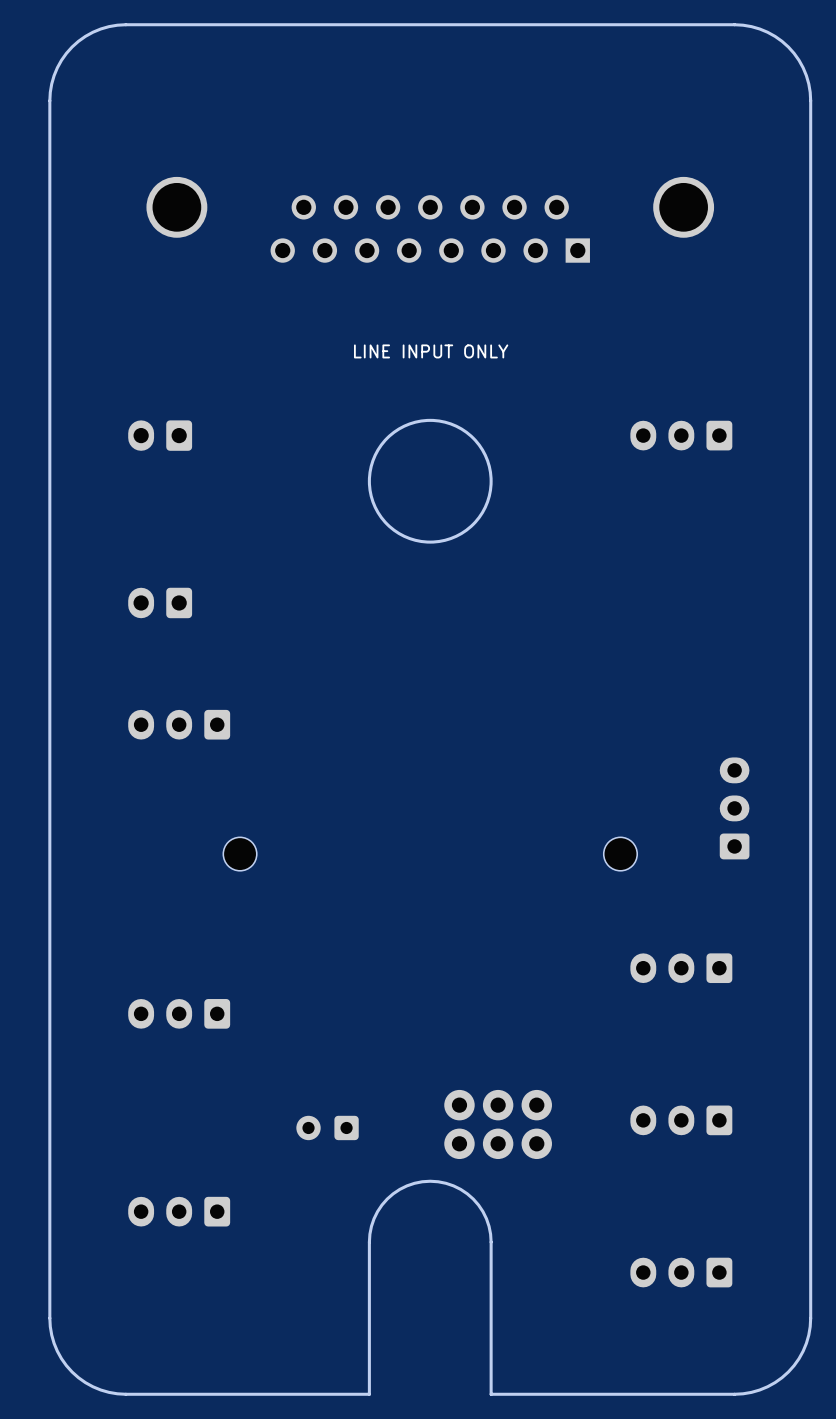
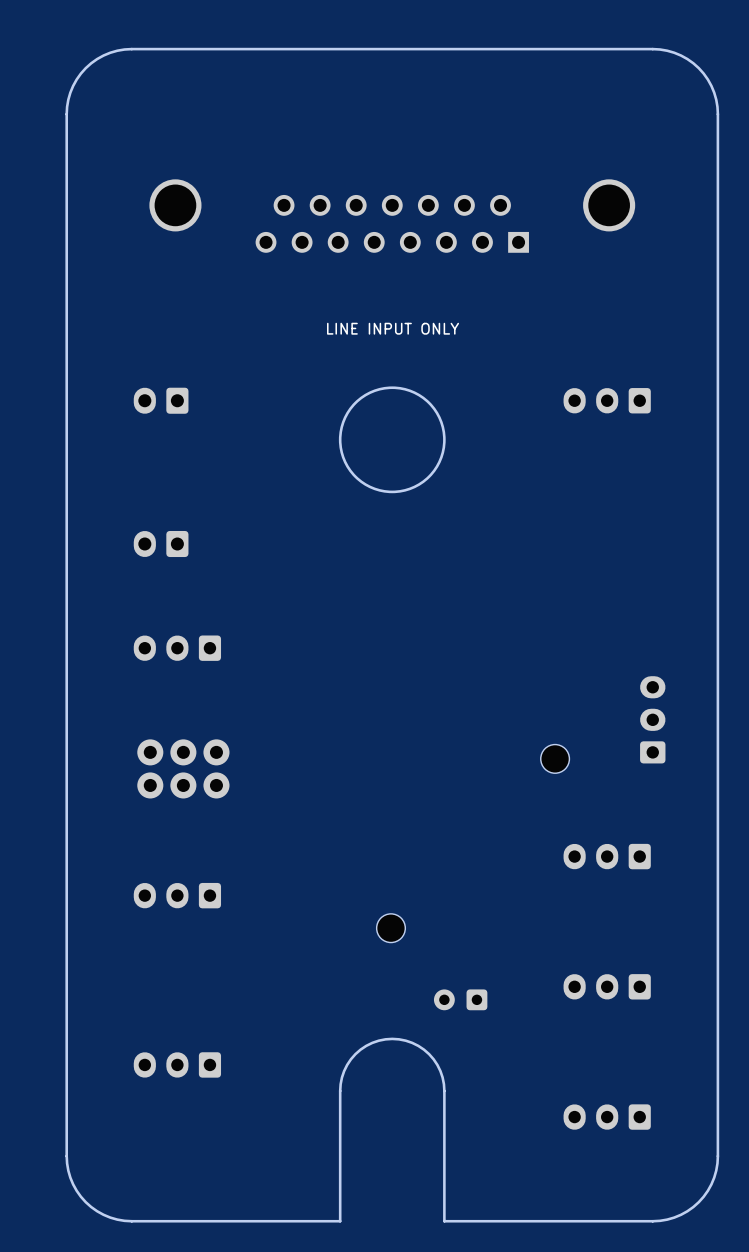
part position: (240, 854) -> (390, 928)
part: none -> (183, 768)
part: (498, 1124) -> none
part position: (327, 1127) -> (460, 999)

